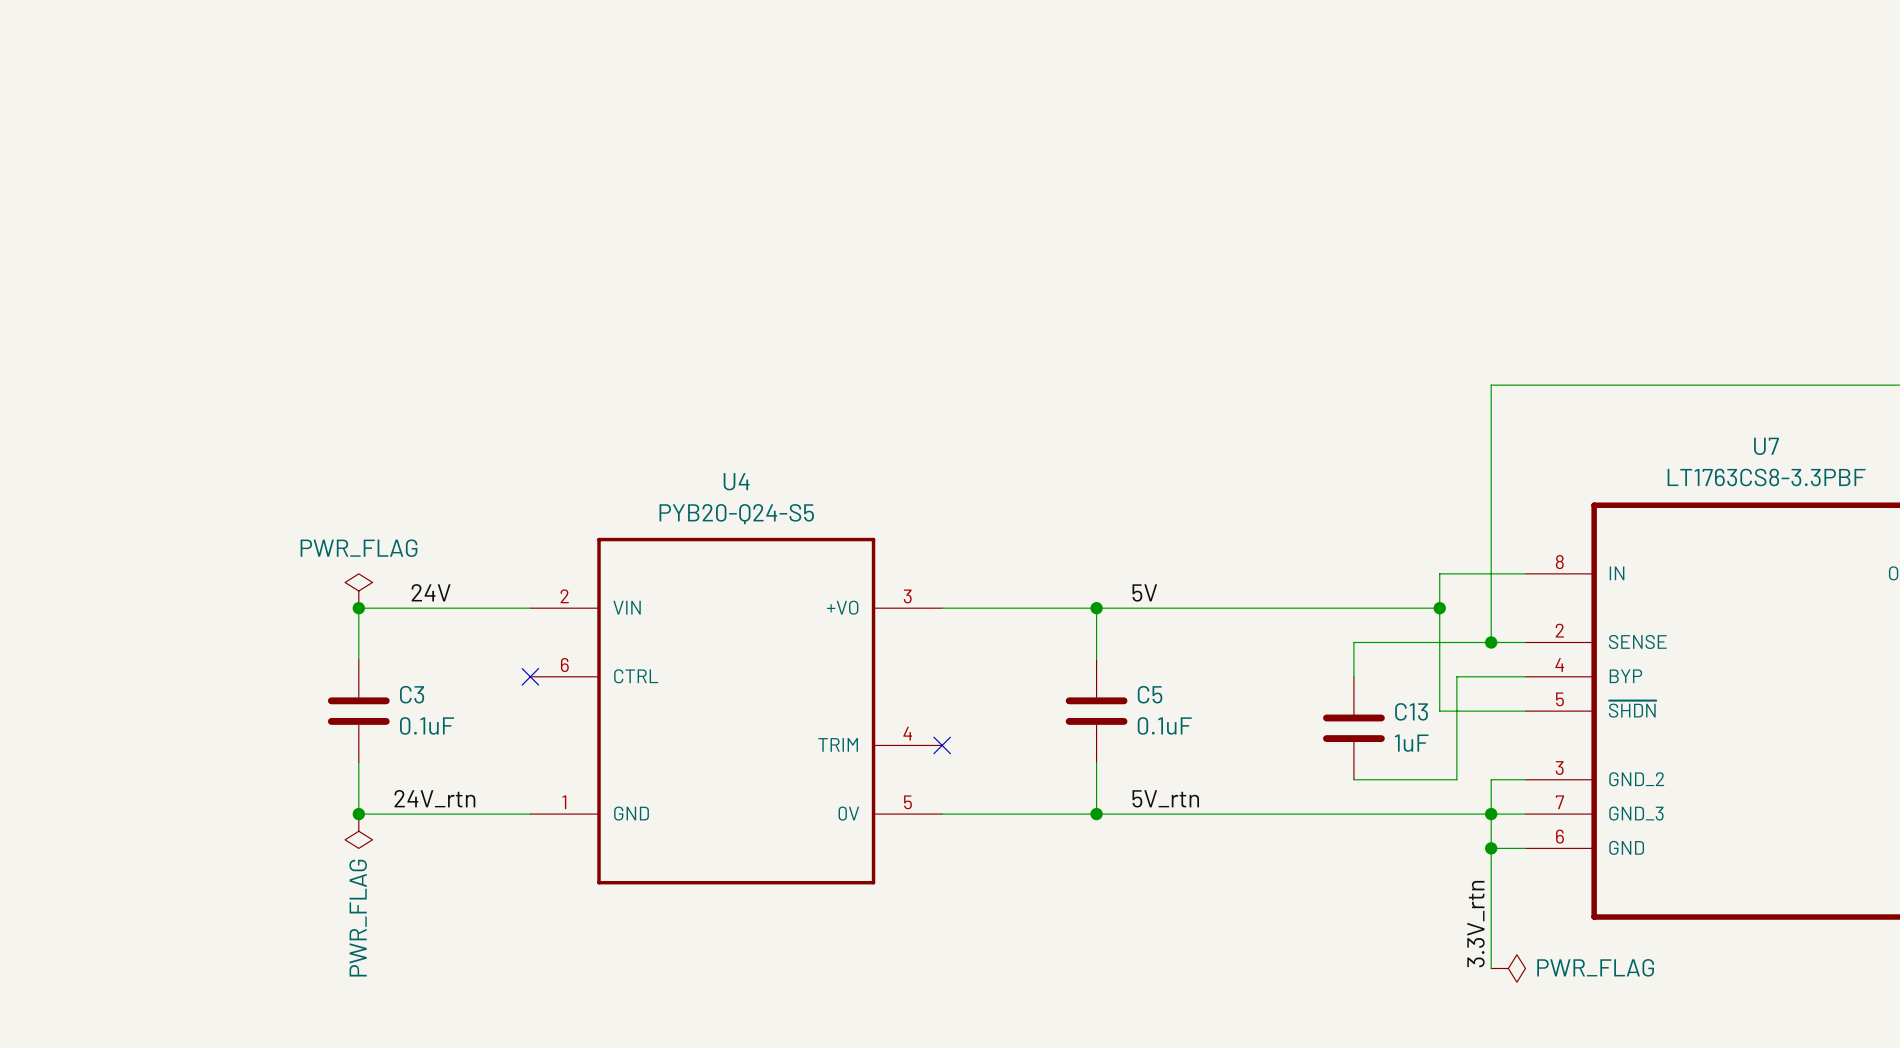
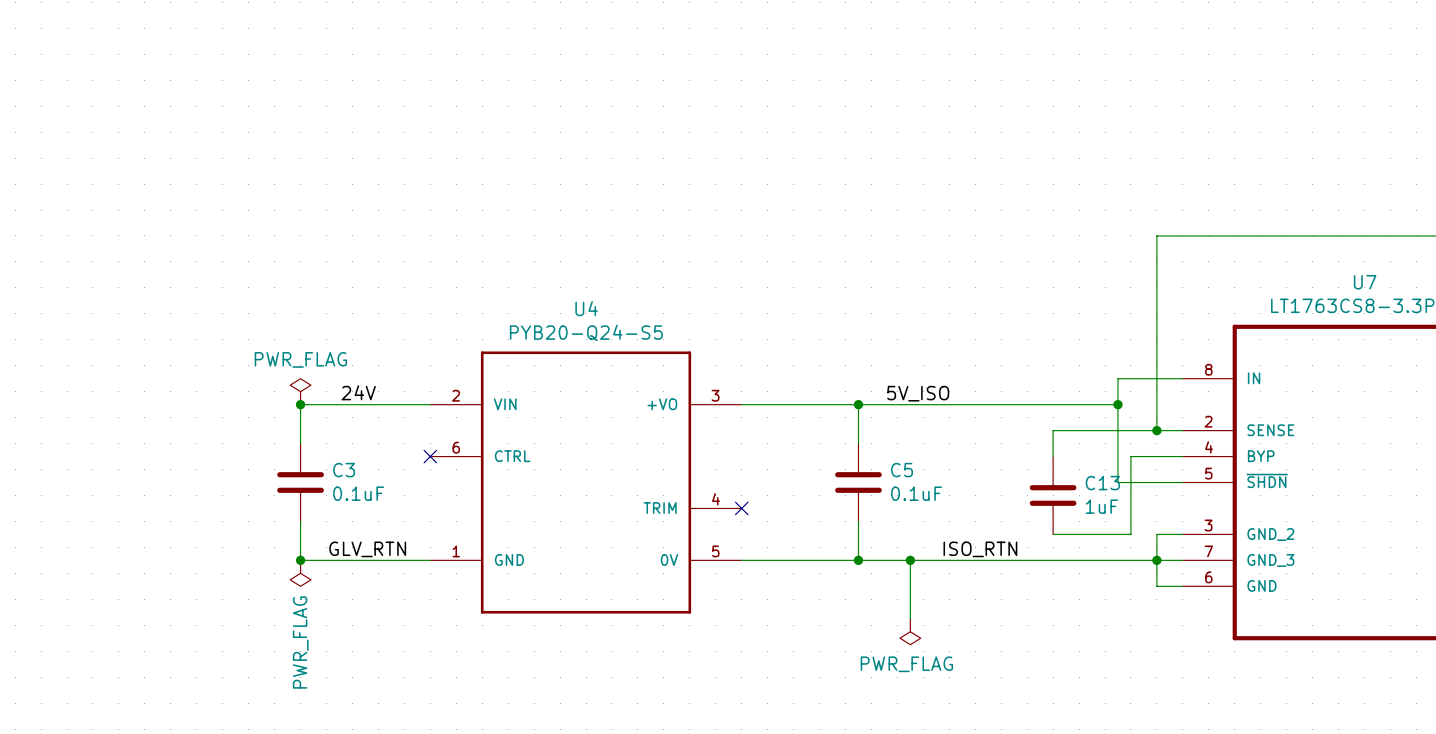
label: 5V (1144, 592) -> 5V_ISO (918, 393)
label: 24V_rtn (434, 798) -> GLV_RTN (367, 549)
label: 5V_rtn (1165, 798) -> none
label: none -> ISO_RTN (980, 549)
wire: none -> (910, 560) (910, 618)
junction: none -> (910, 560)
wire: (1491, 848) (1491, 968) -> none
junction: (1491, 848) -> none
power symbol: none -> PWR_FLAG (910, 631)
label: 3.3V_rtn (1475, 924) -> none
power symbol: PWR_FLAG (1508, 968) -> none

